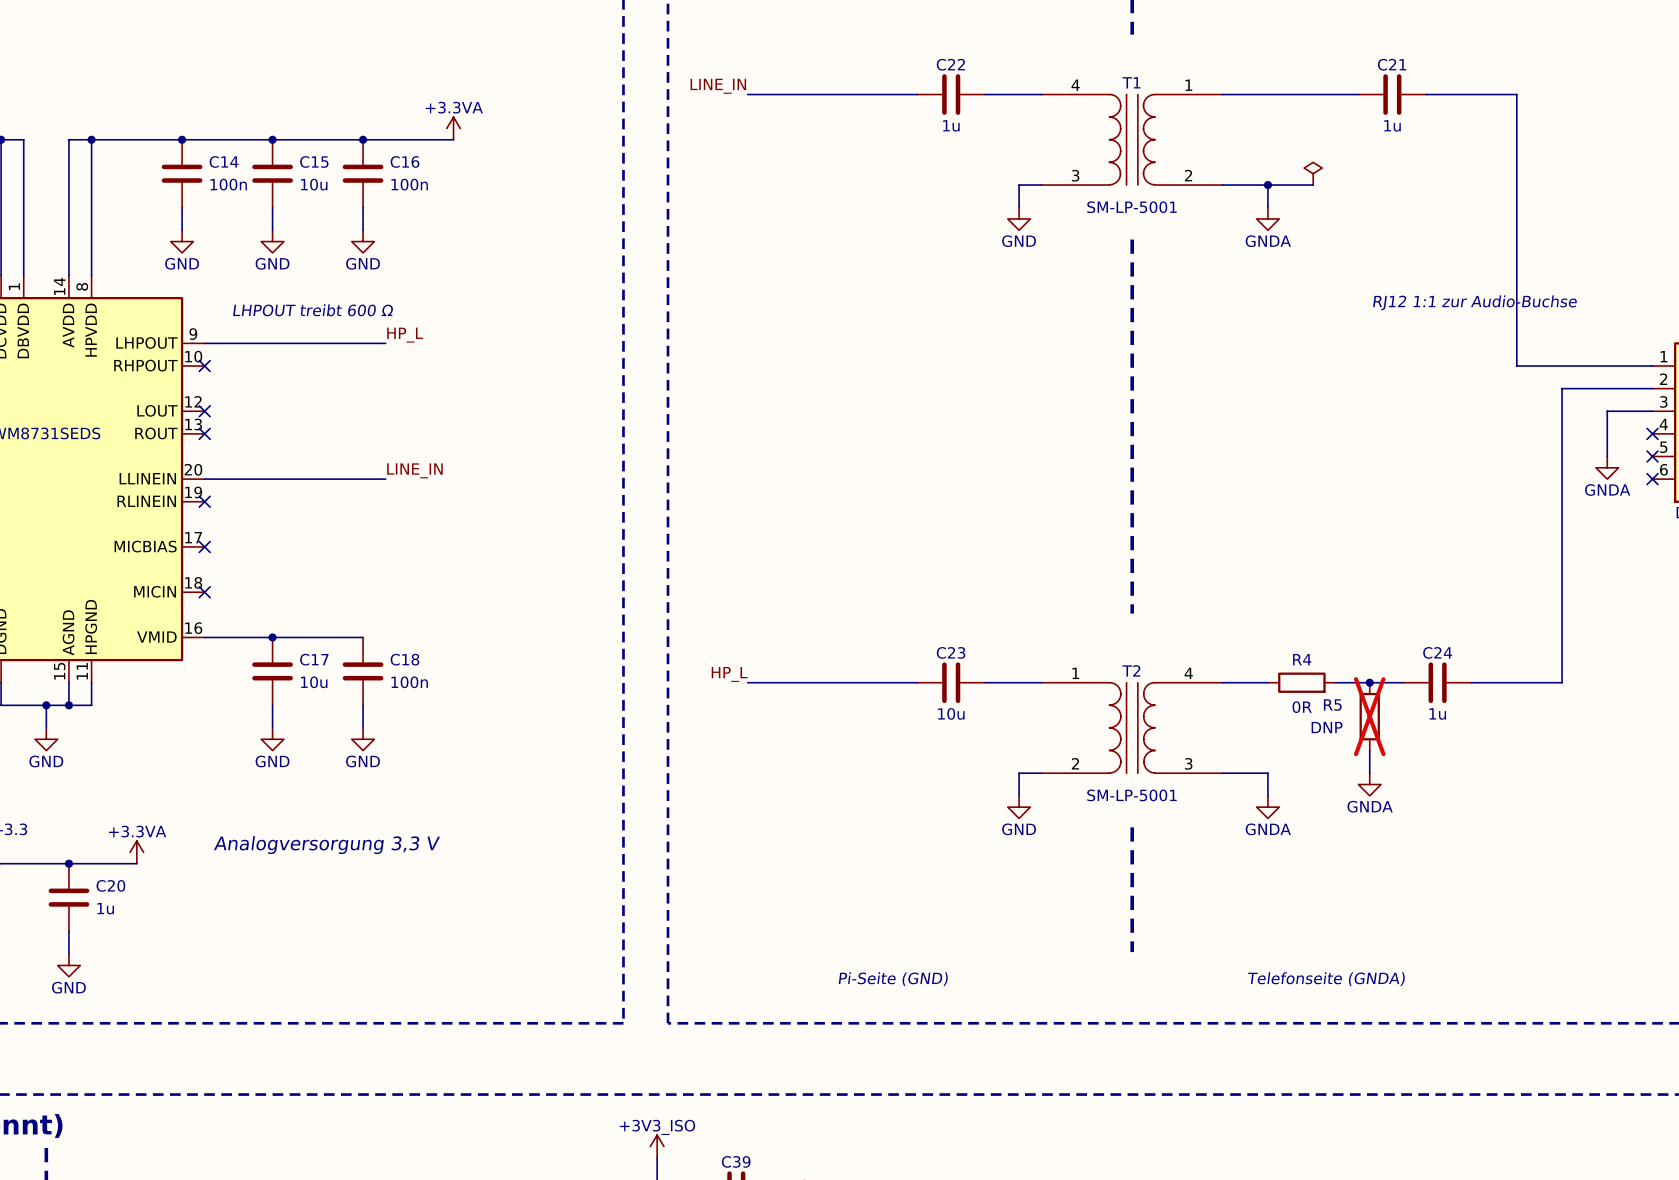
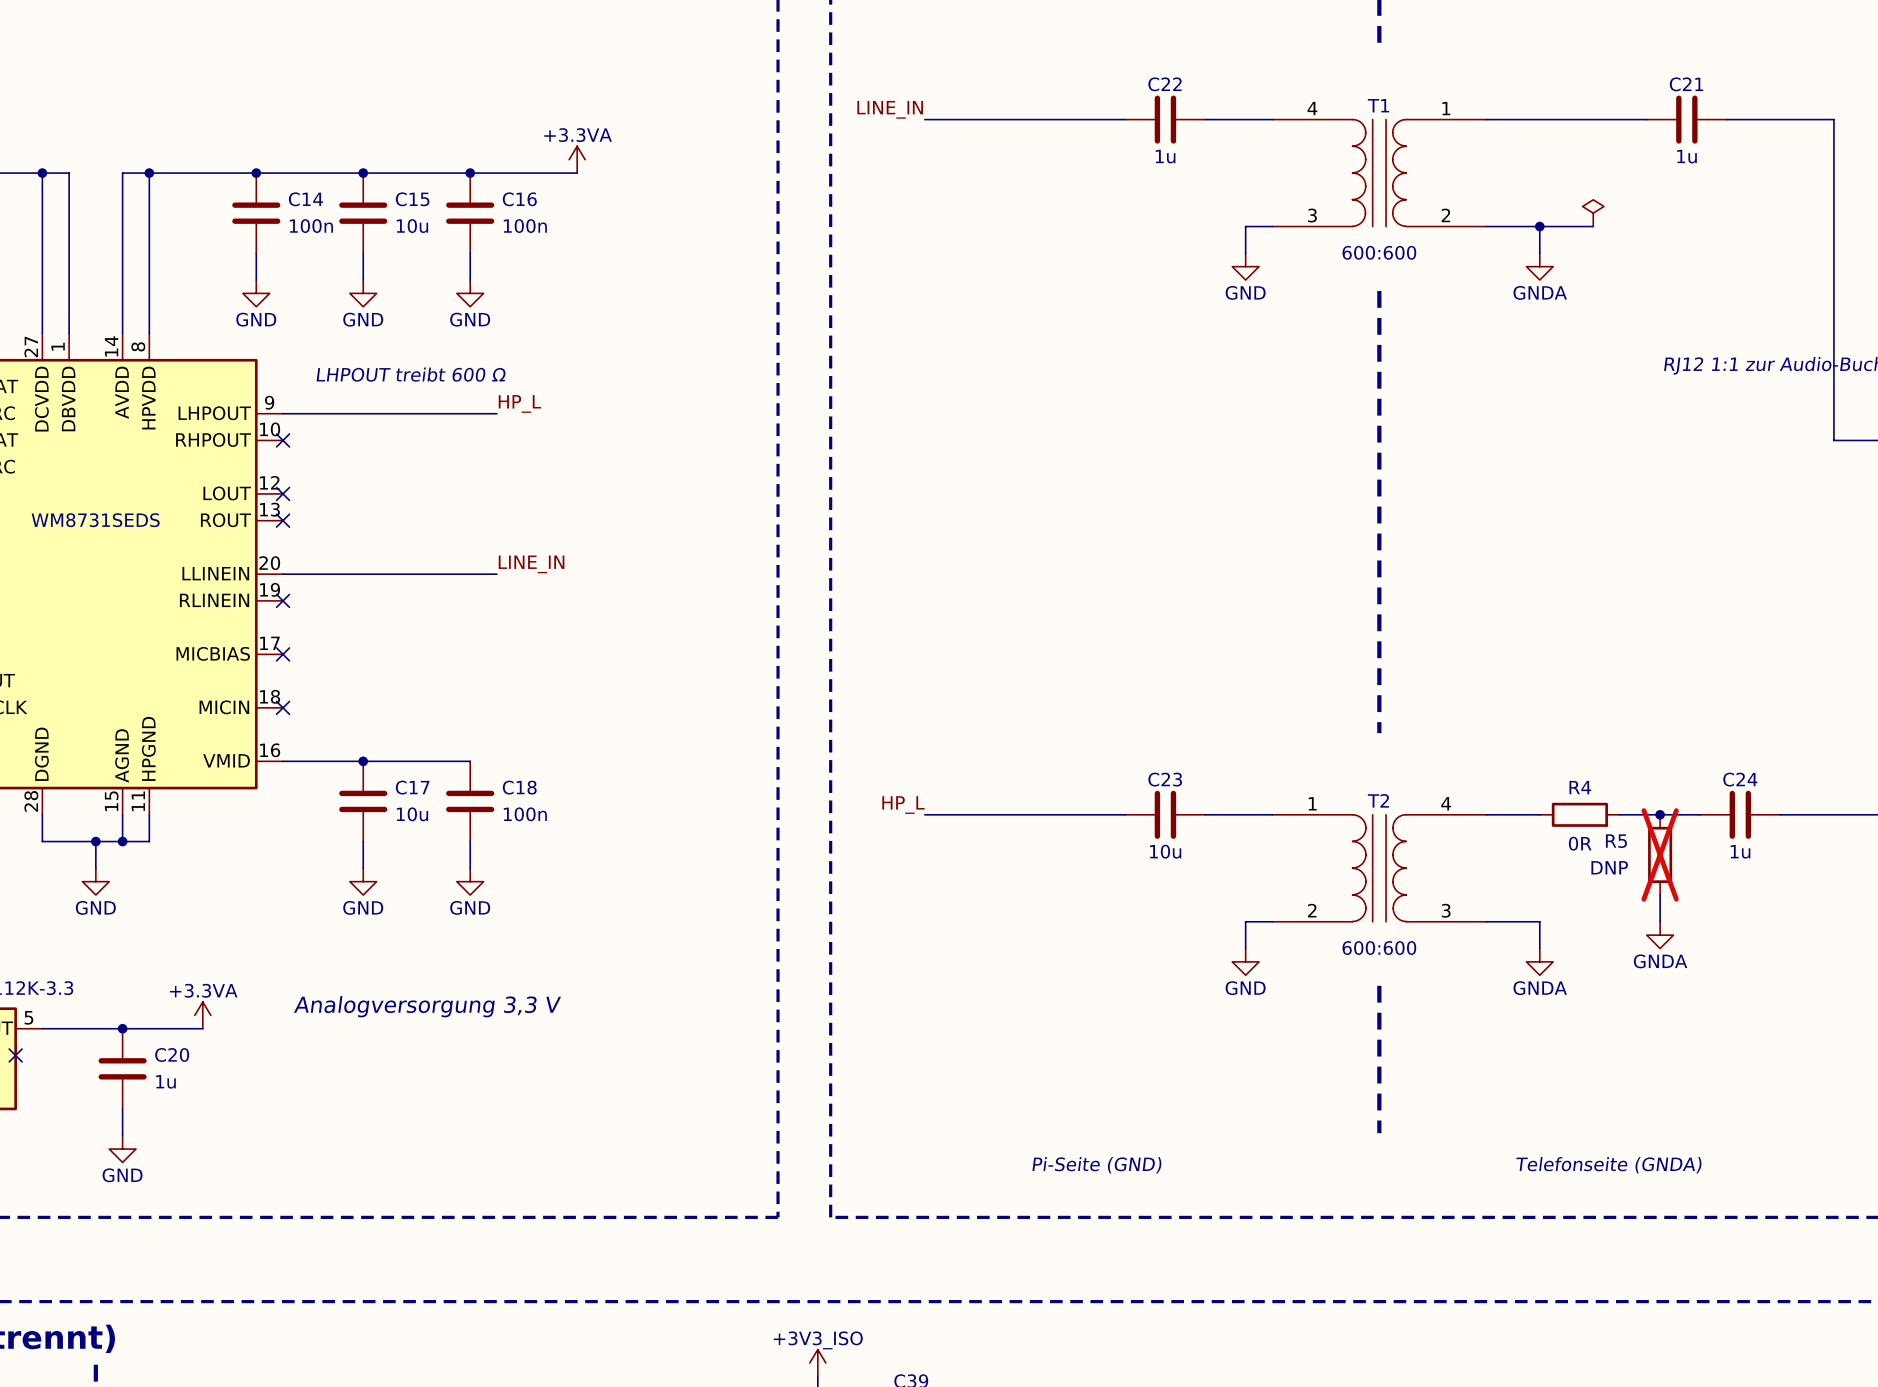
T1 value: SM-LP-5001 (1132, 207) -> 600:600 (1379, 252)
T2 value: SM-LP-5001 (1132, 795) -> 600:600 (1379, 948)

